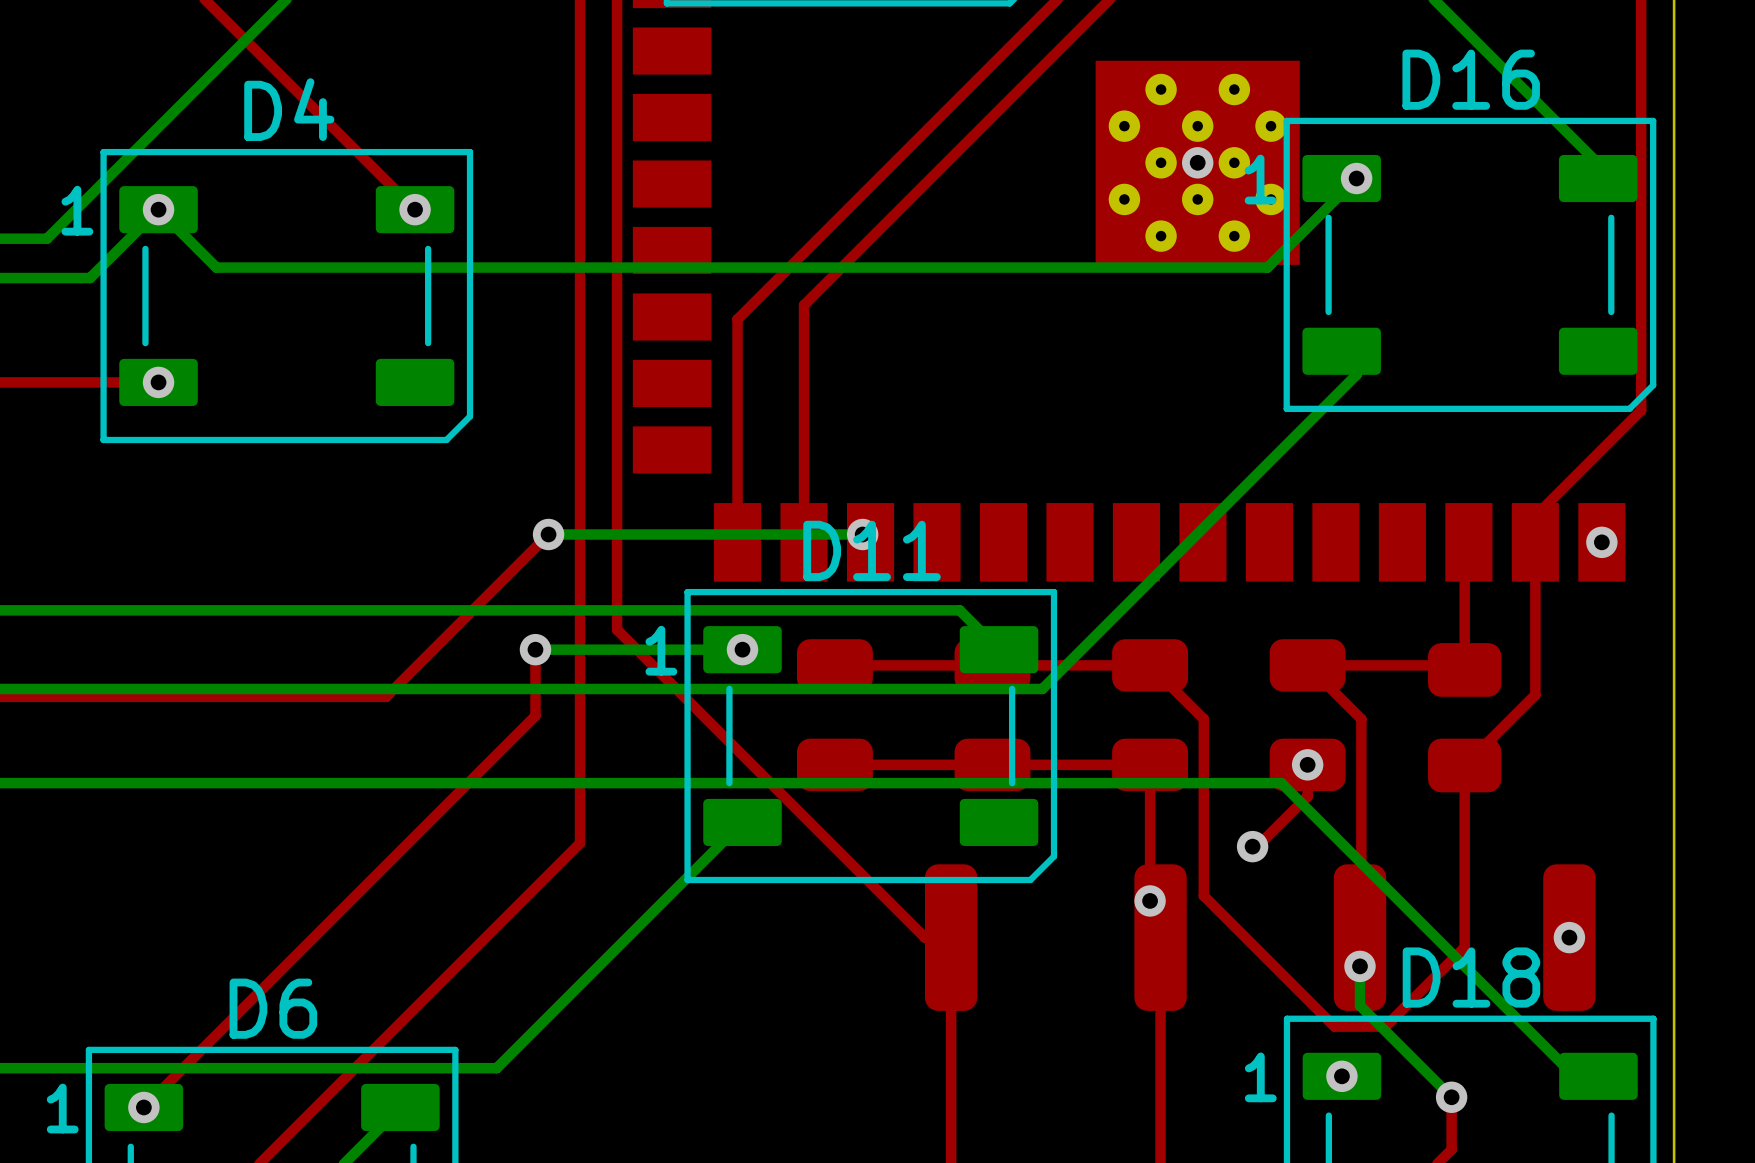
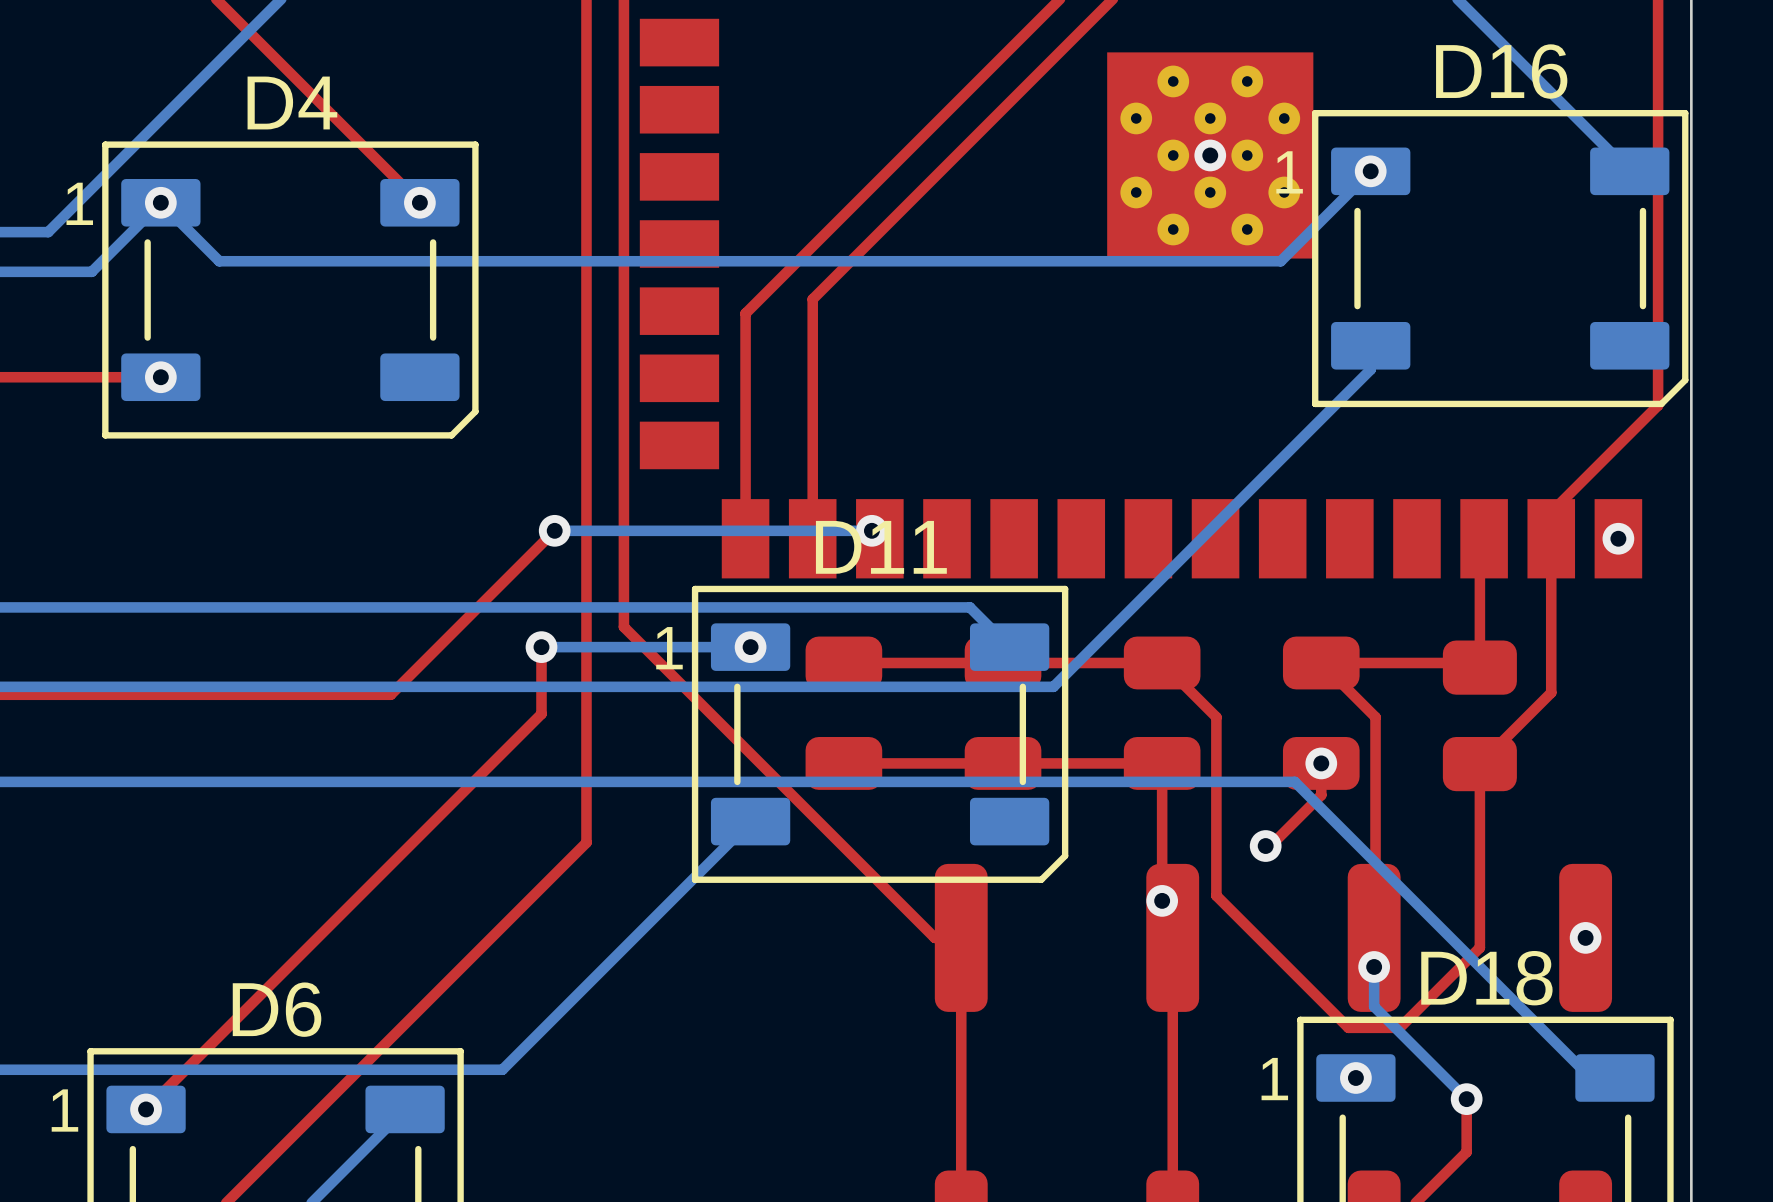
D16 position: (1469, 264) -> (1500, 258)

